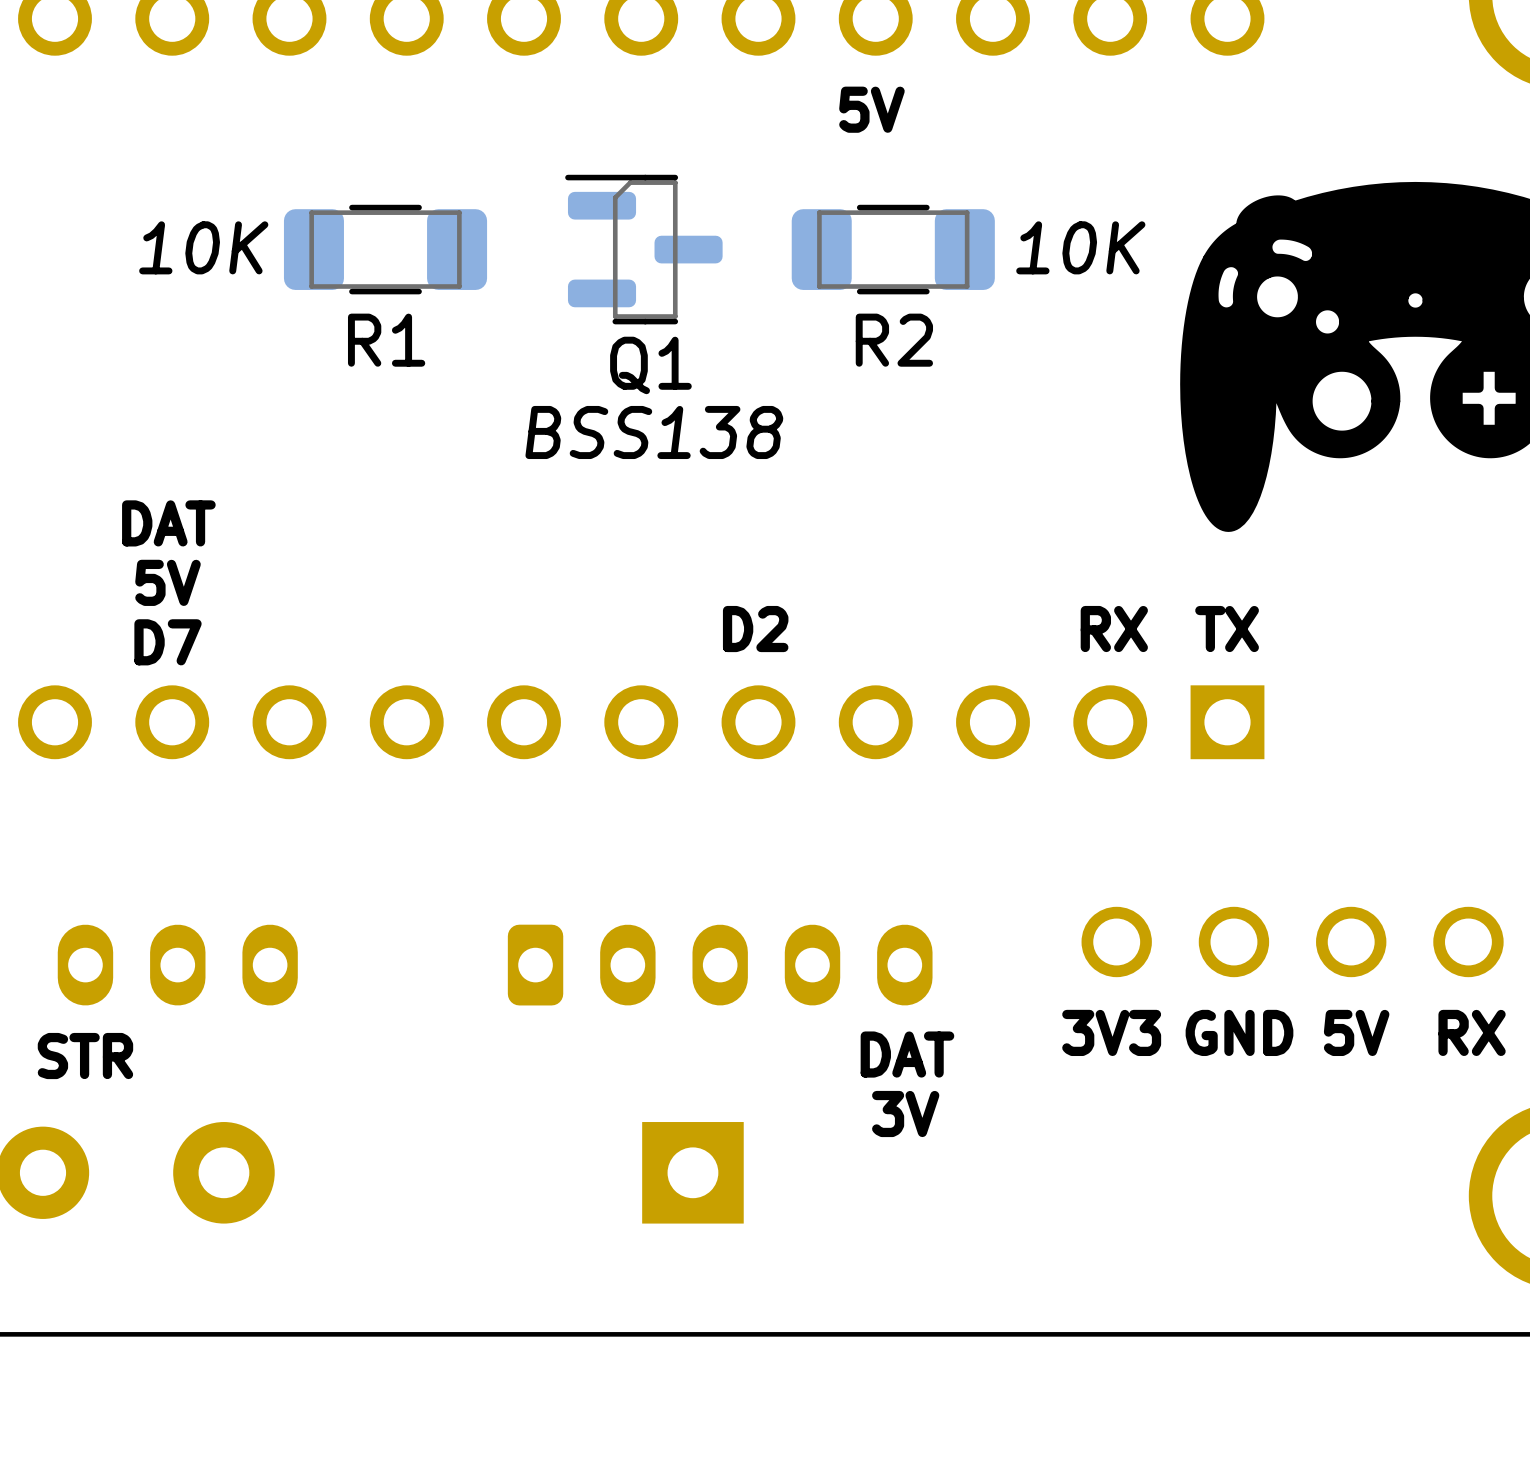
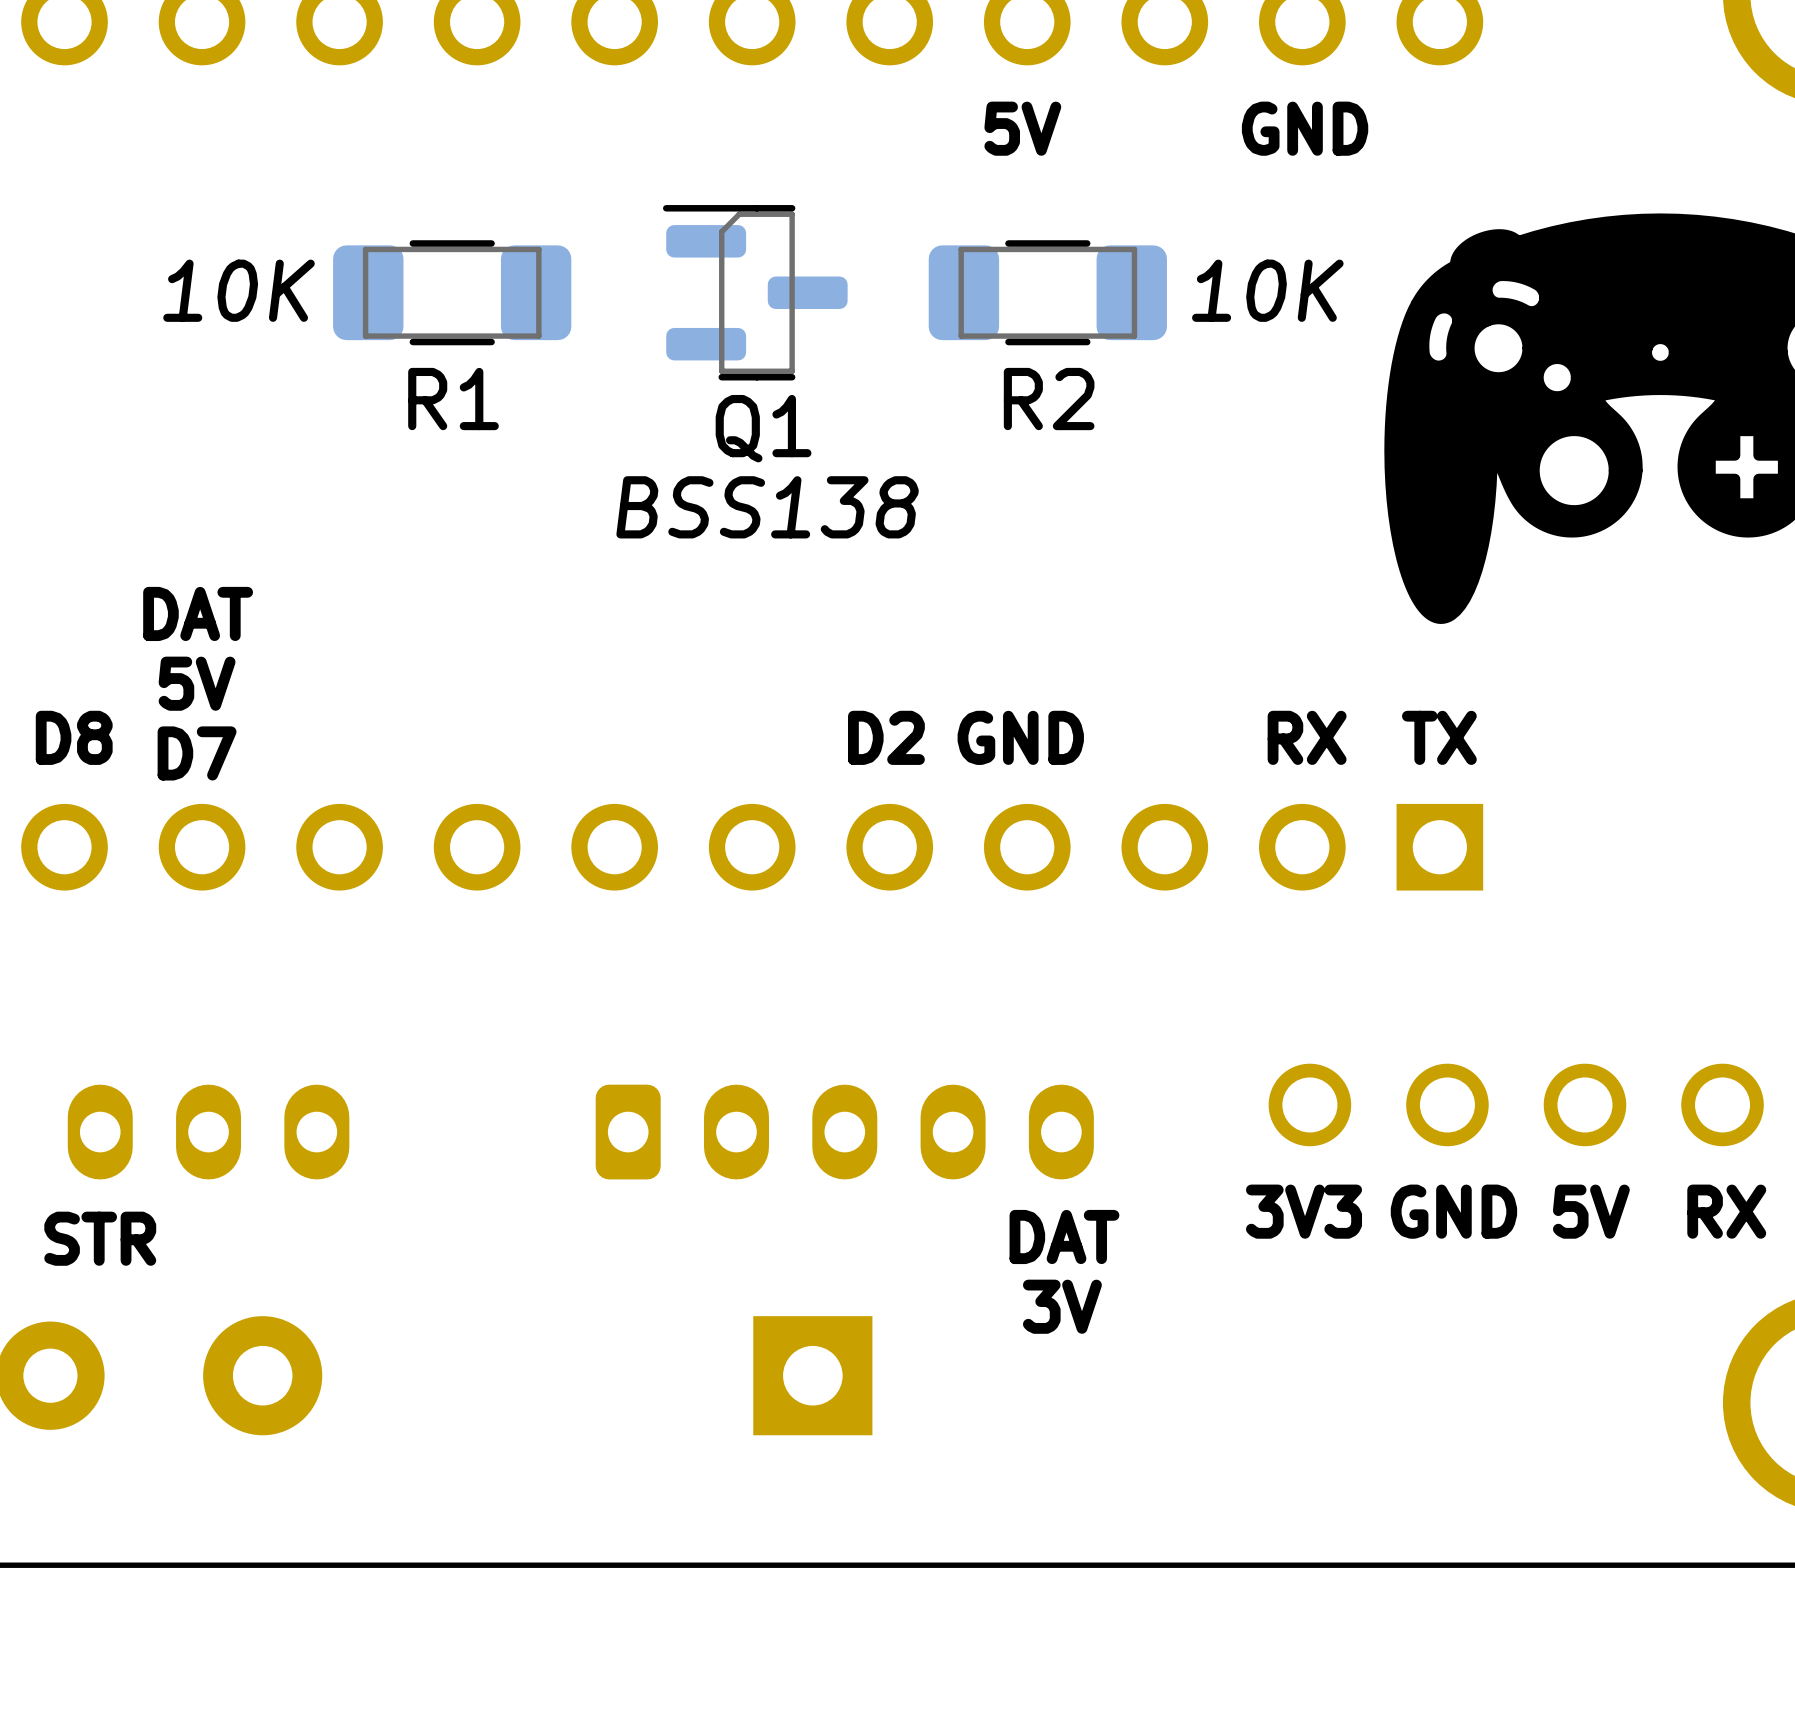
text: none -> GND (1305, 128)
text: none -> D8 (74, 737)
text: none -> GND (1020, 737)

